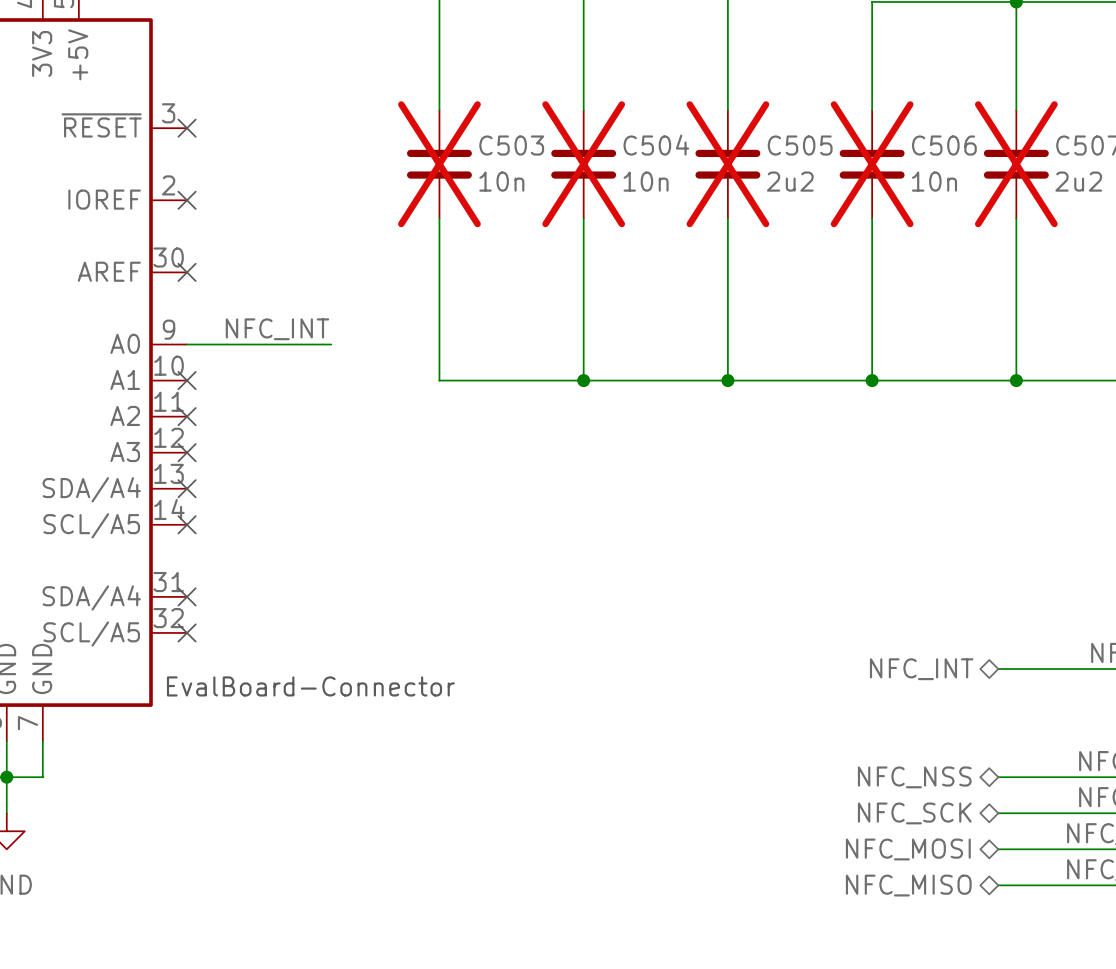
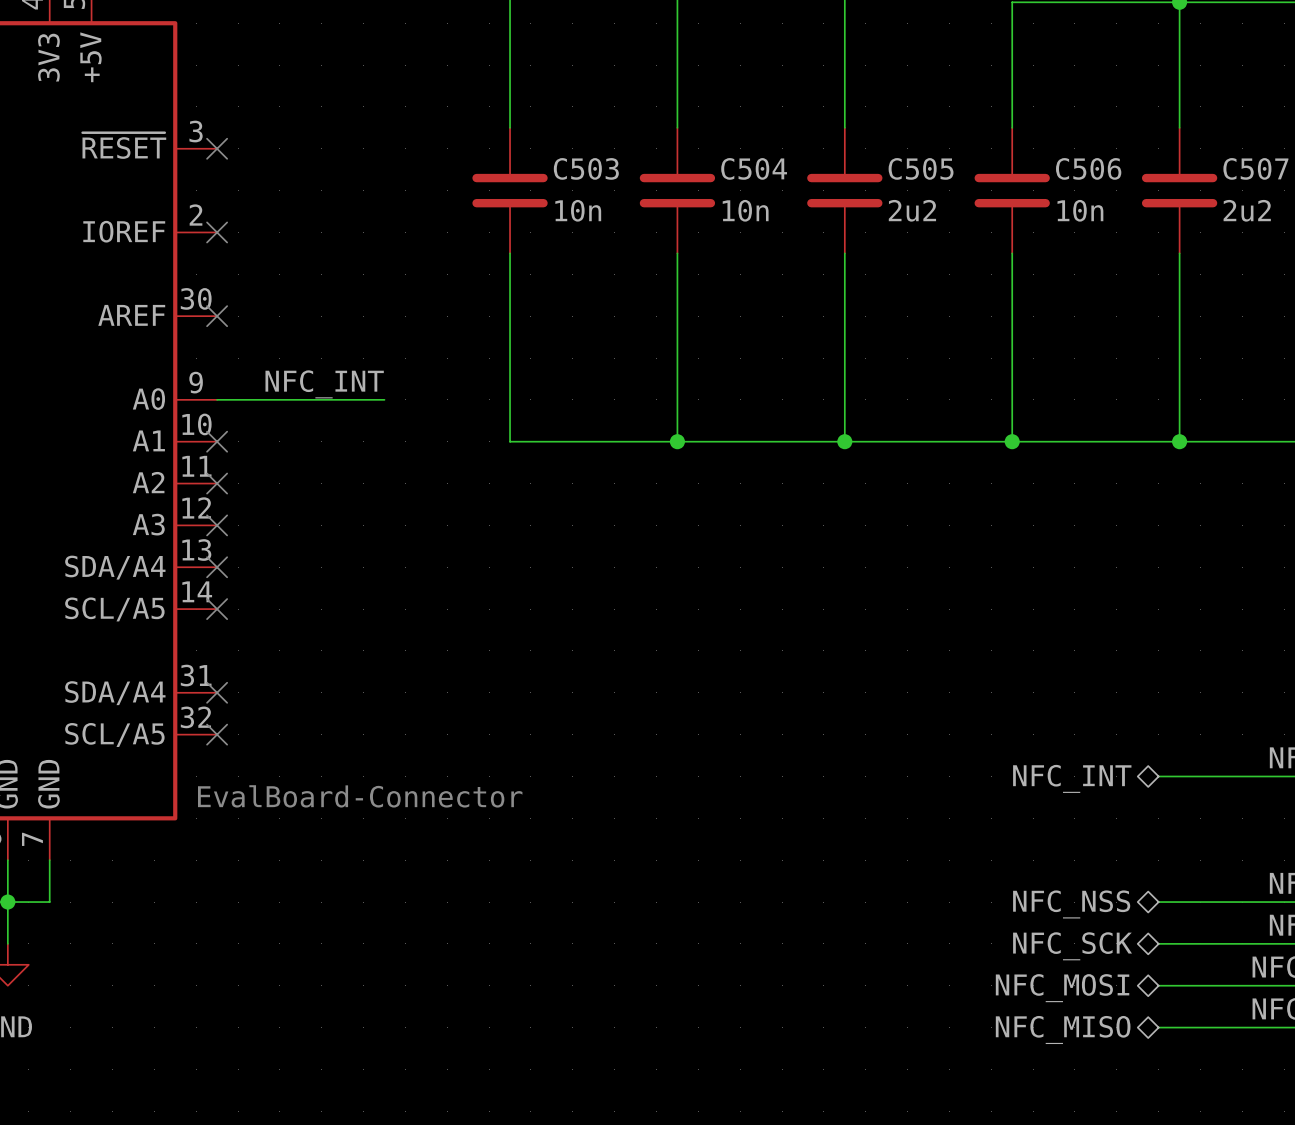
C503 do-not-place cross: (439, 164) -> none
C504 do-not-place cross: (583, 164) -> none
C505 do-not-place cross: (727, 164) -> none
C506 do-not-place cross: (872, 164) -> none
C507 do-not-place cross: (1016, 164) -> none

